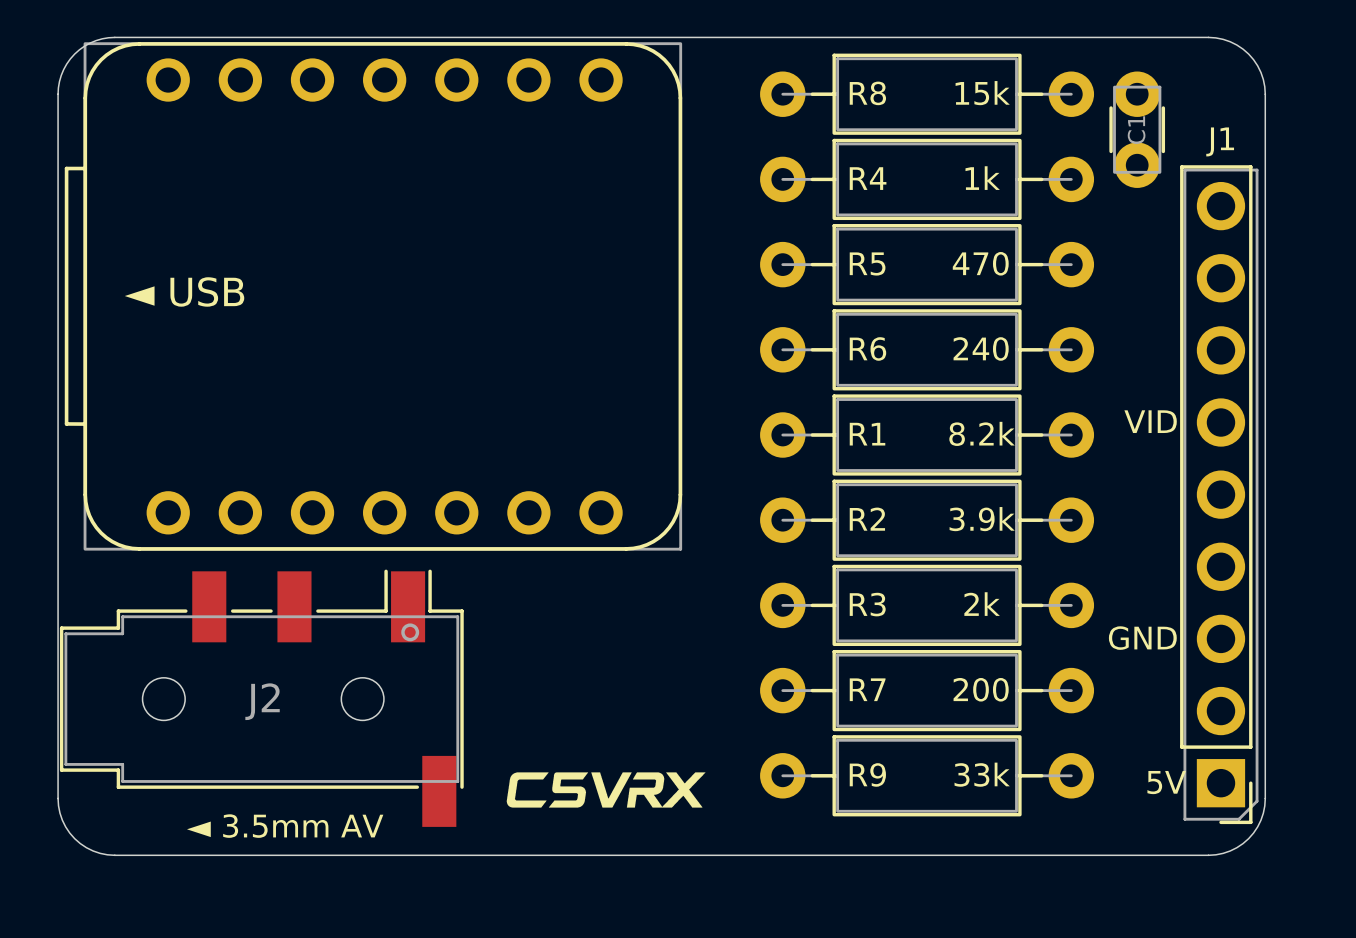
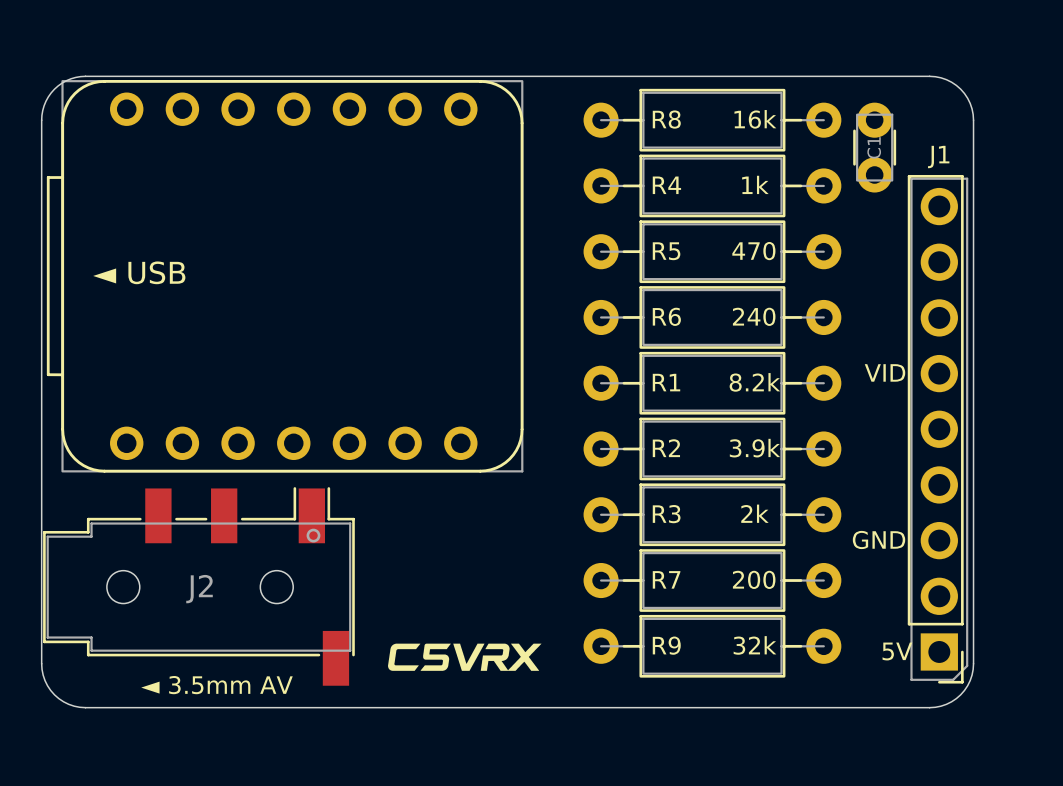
R8 value: 15k (982, 93) -> 16k (755, 119)
R9 value: 33k (982, 774) -> 32k (754, 645)

